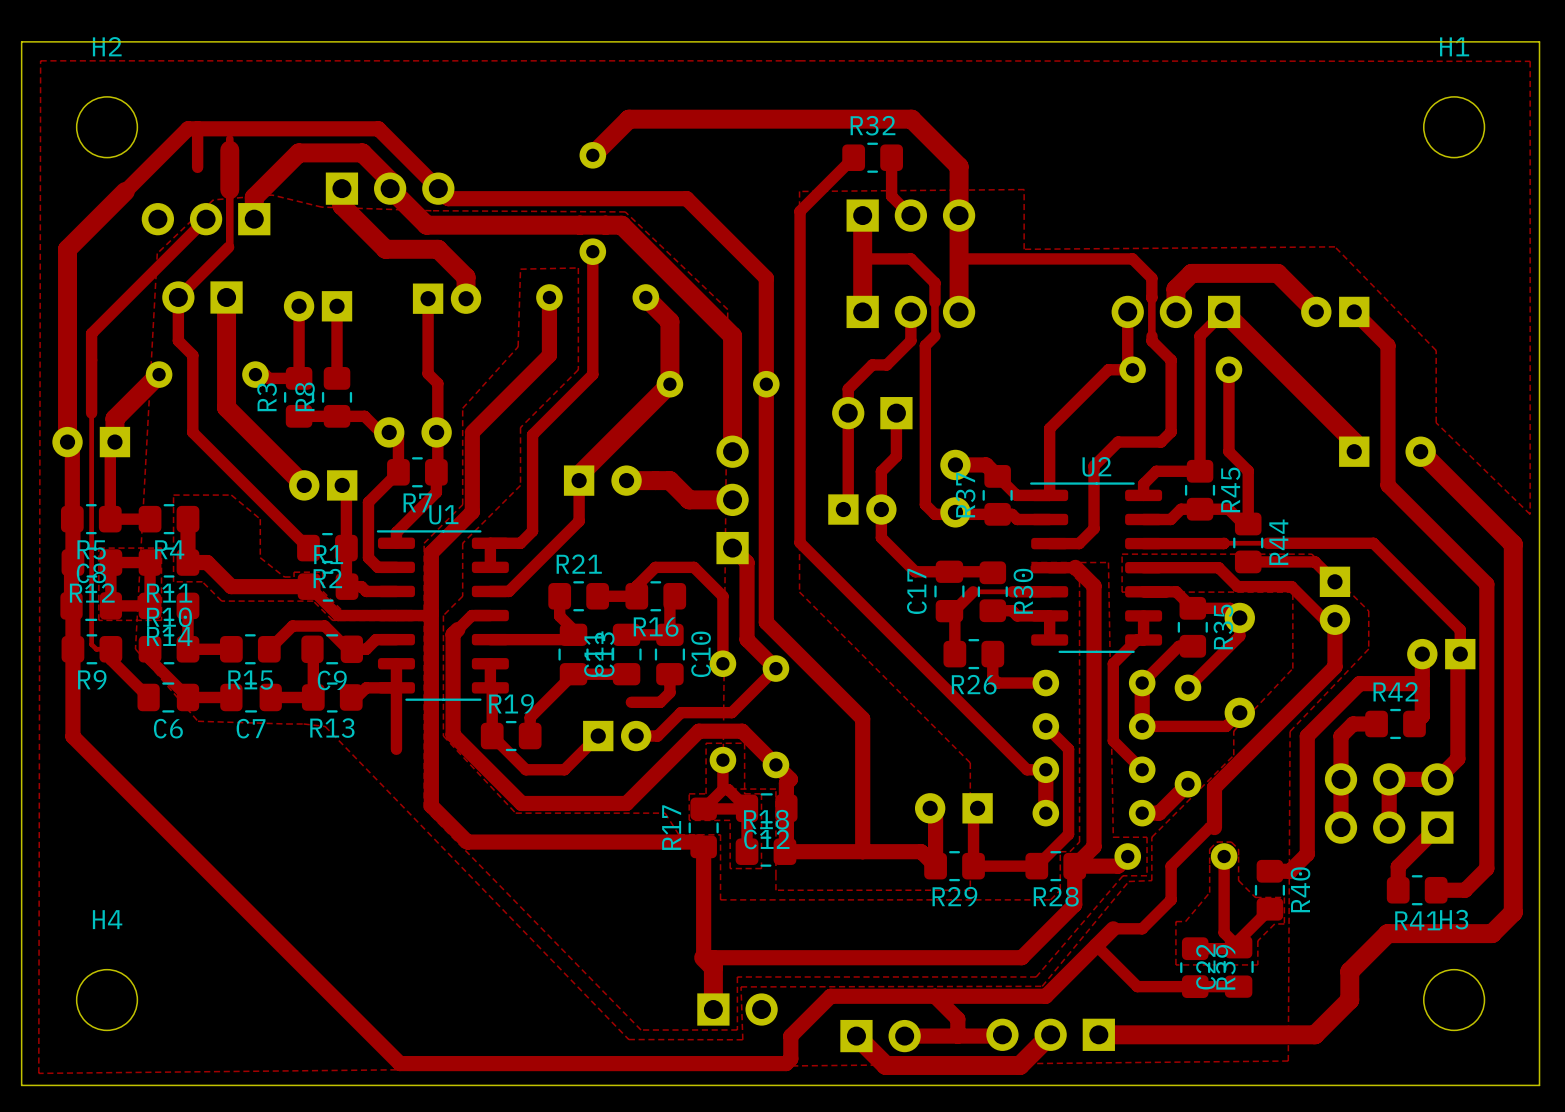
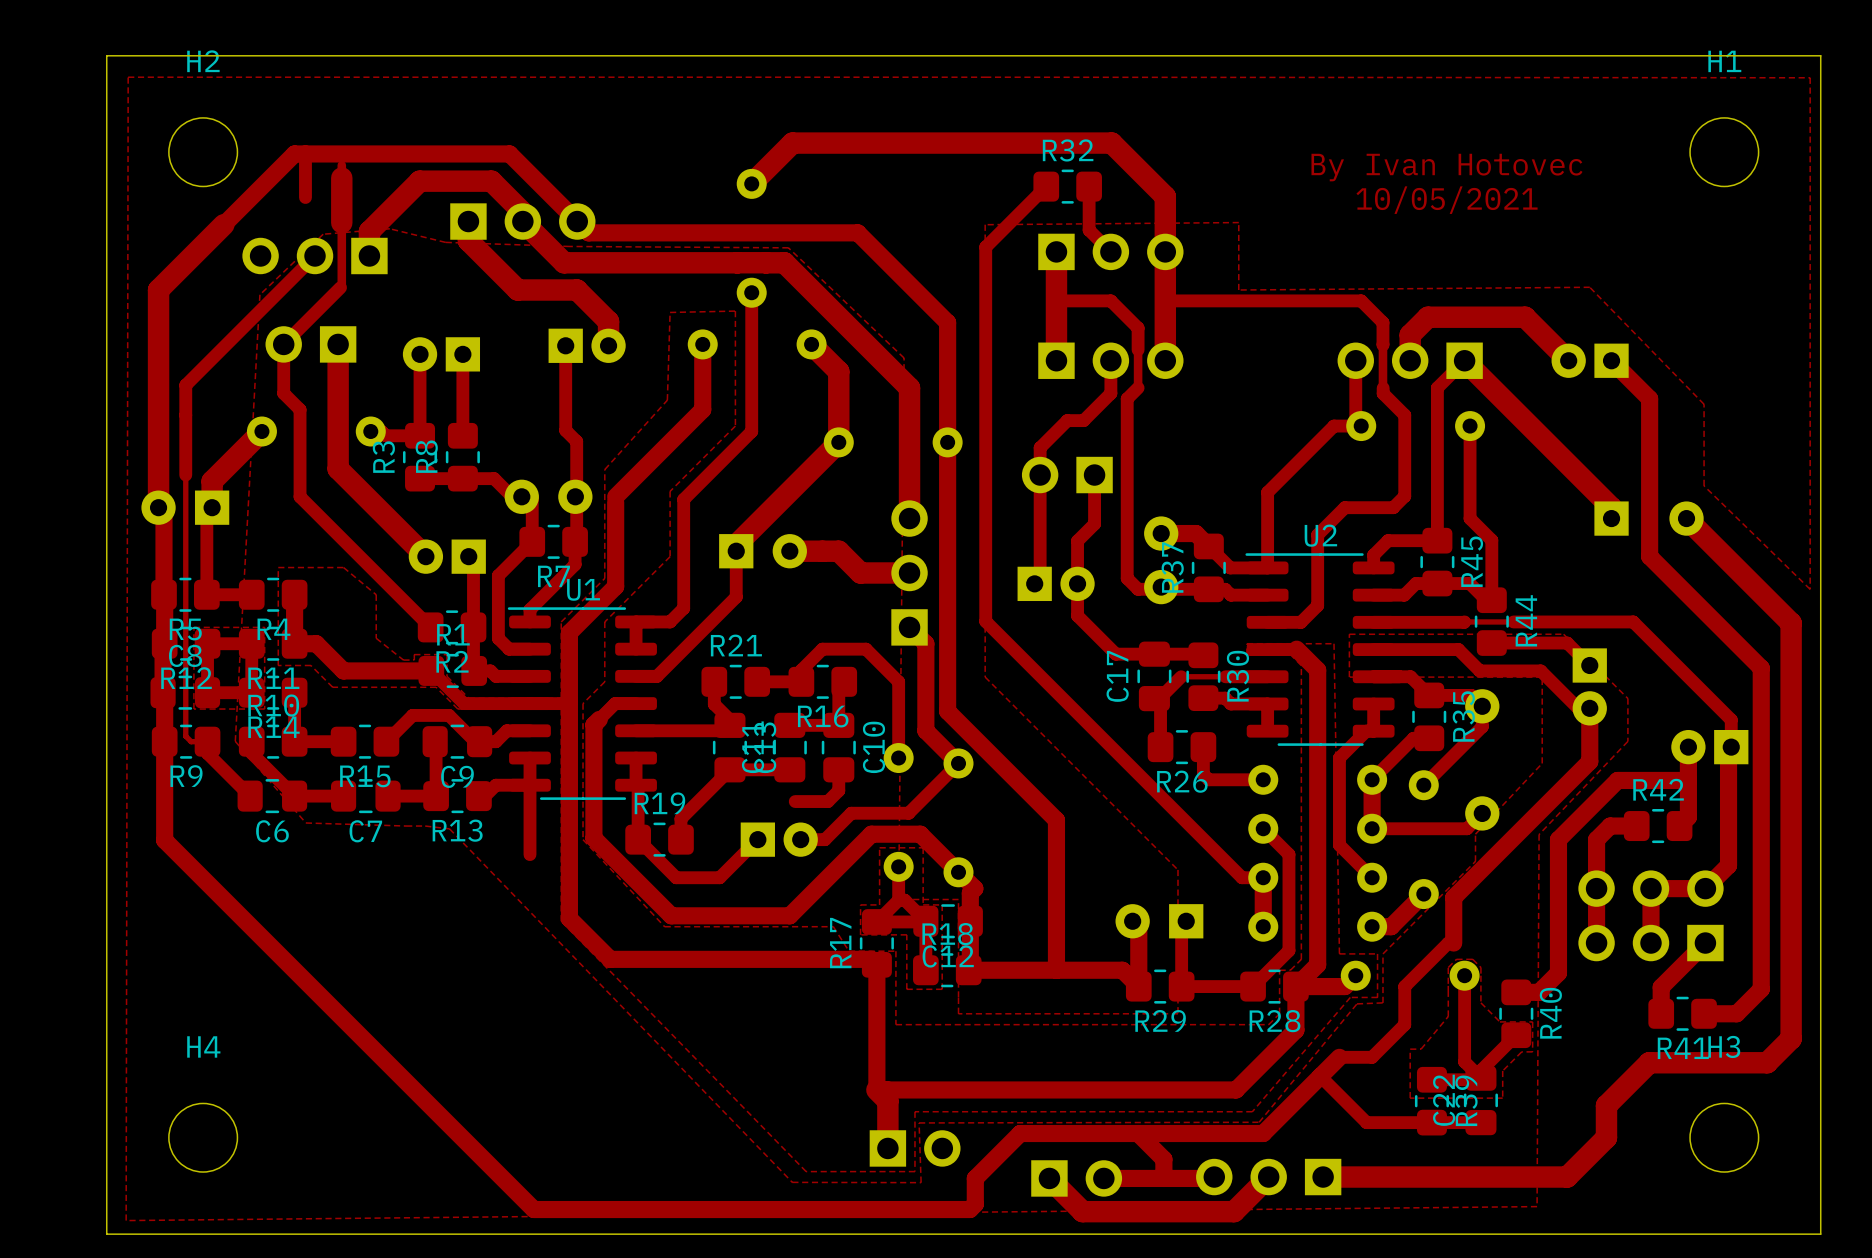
text: none -> By Ivan Hotovec (1446, 167)
text: none -> 10/05/2021 (1447, 200)

